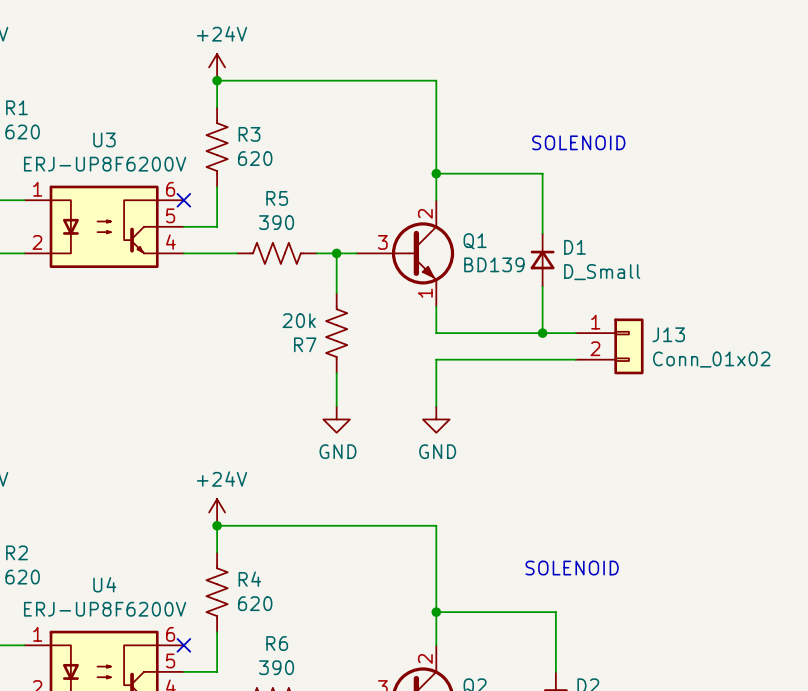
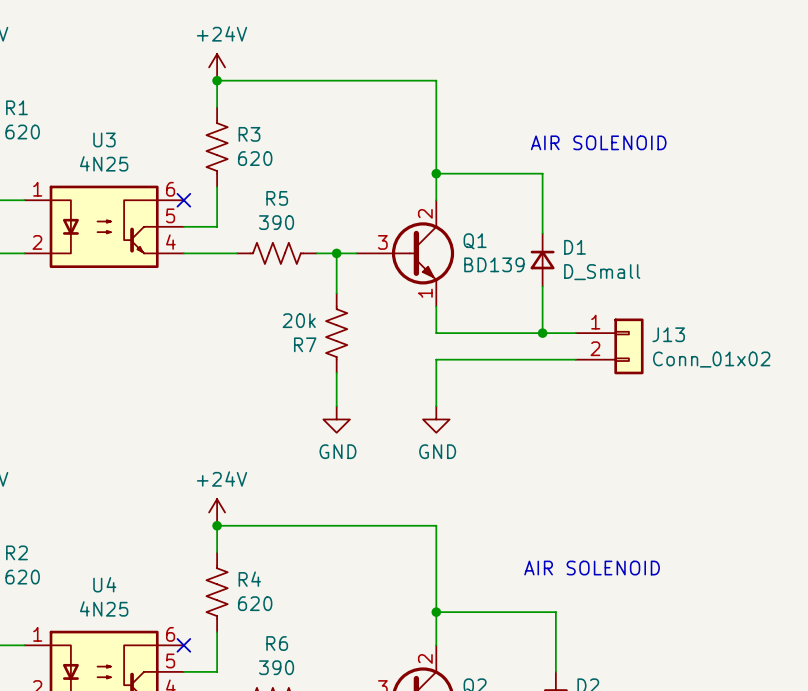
text: SOLENOID (578, 142) -> AIR SOLENOID (598, 142)
U3 value: ERJ-UP8F6200V (105, 164) -> 4N25 (104, 163)
text: SOLENOID (572, 568) -> AIR SOLENOID (592, 568)
U4 value: ERJ-UP8F6200V (105, 609) -> 4N25 (104, 608)

